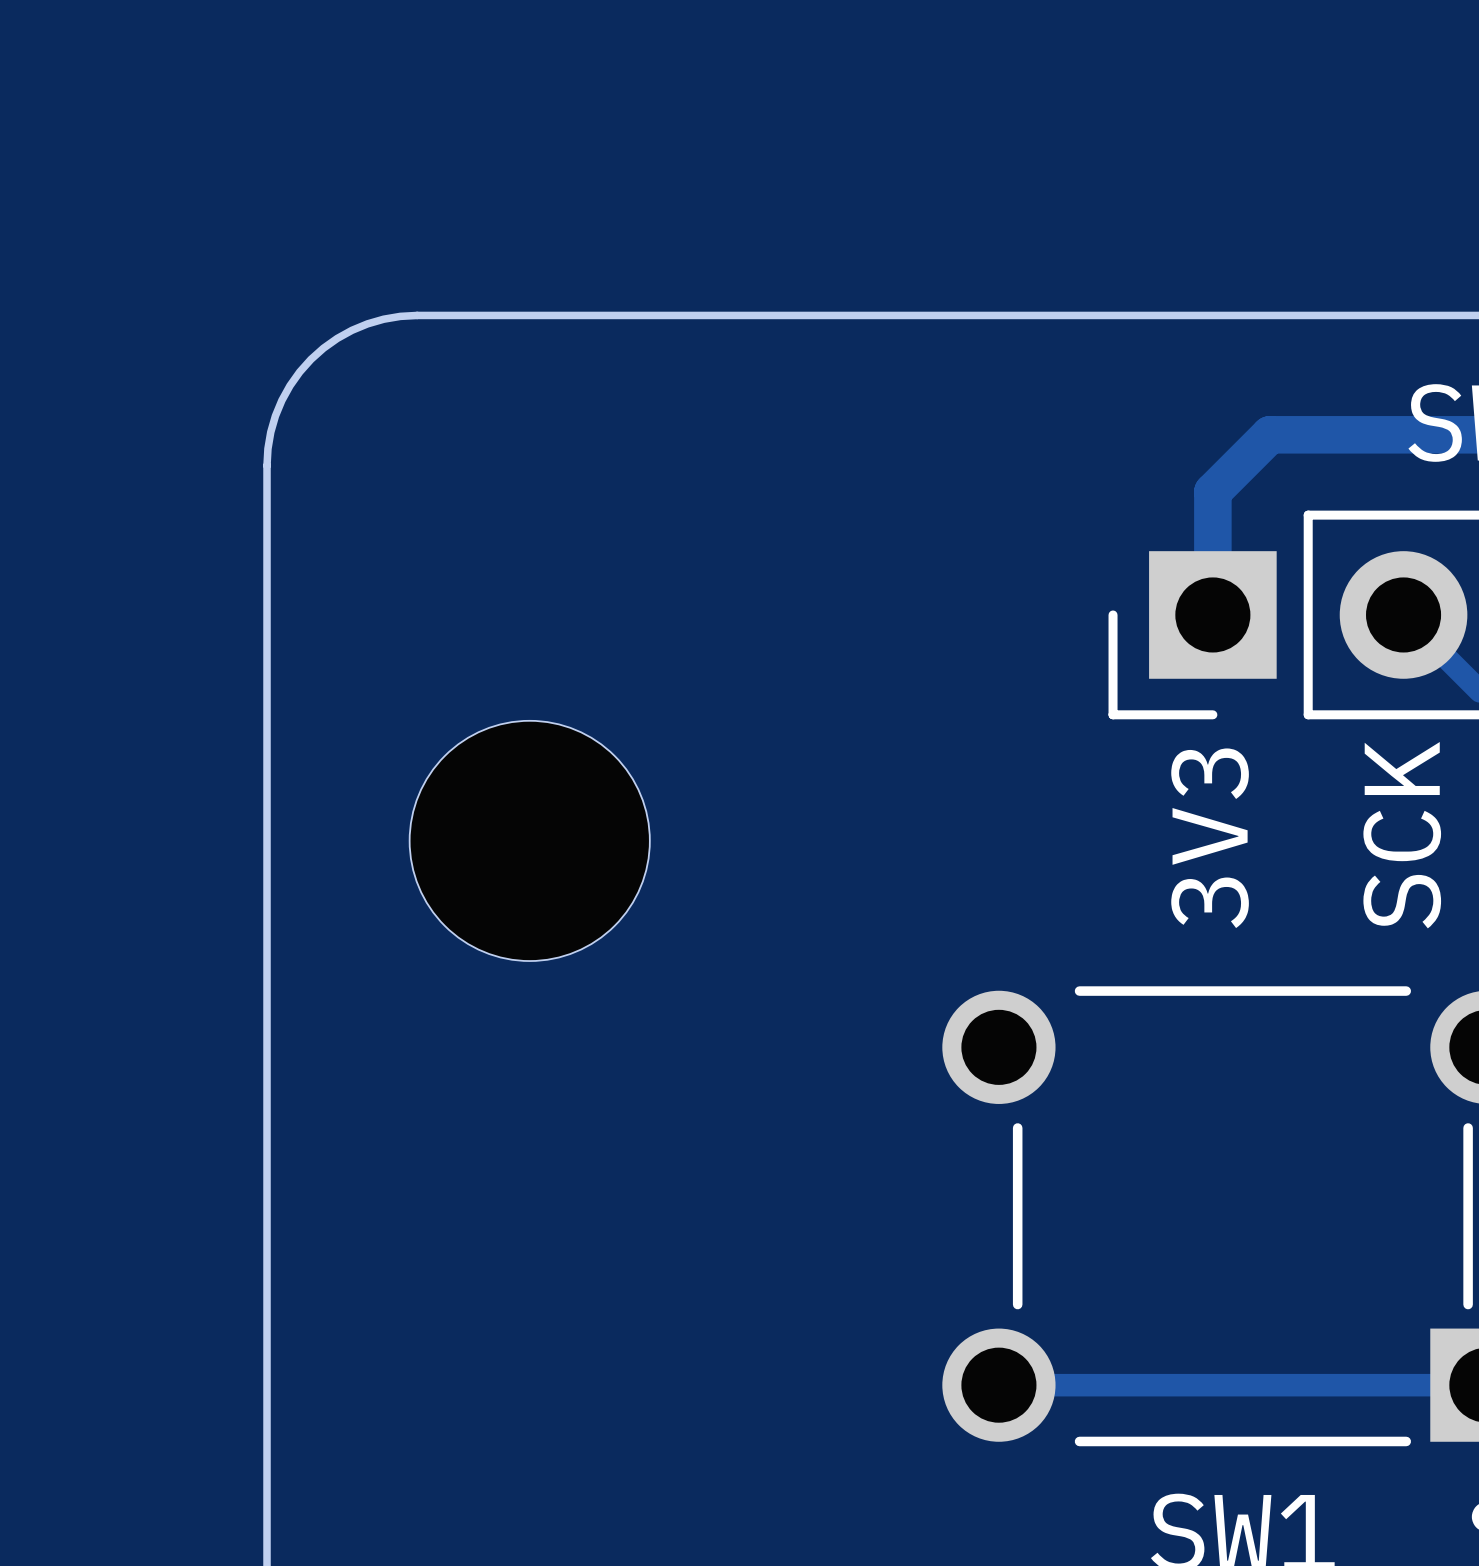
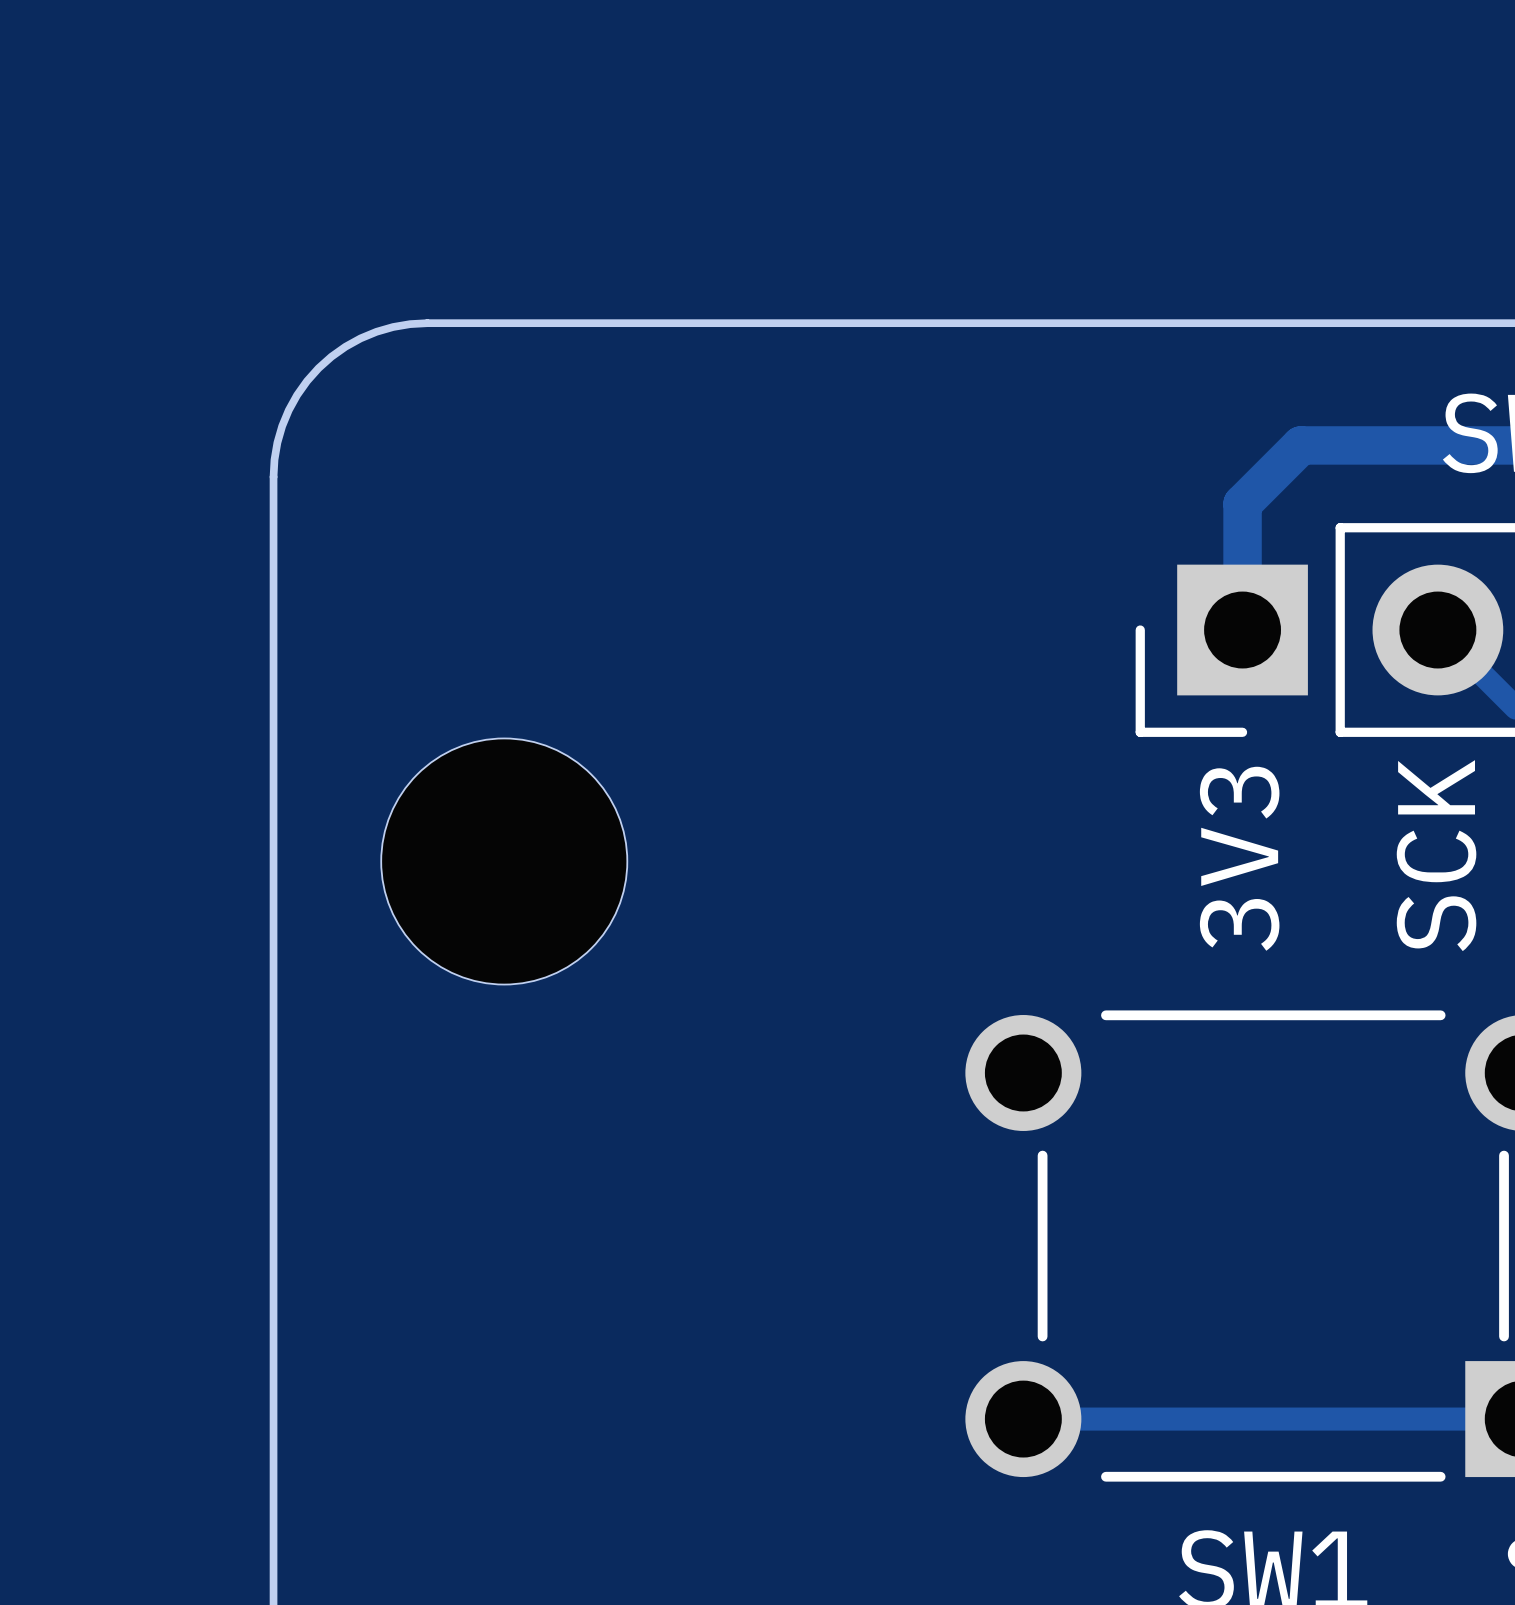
part position: (529, 840) -> (504, 861)

